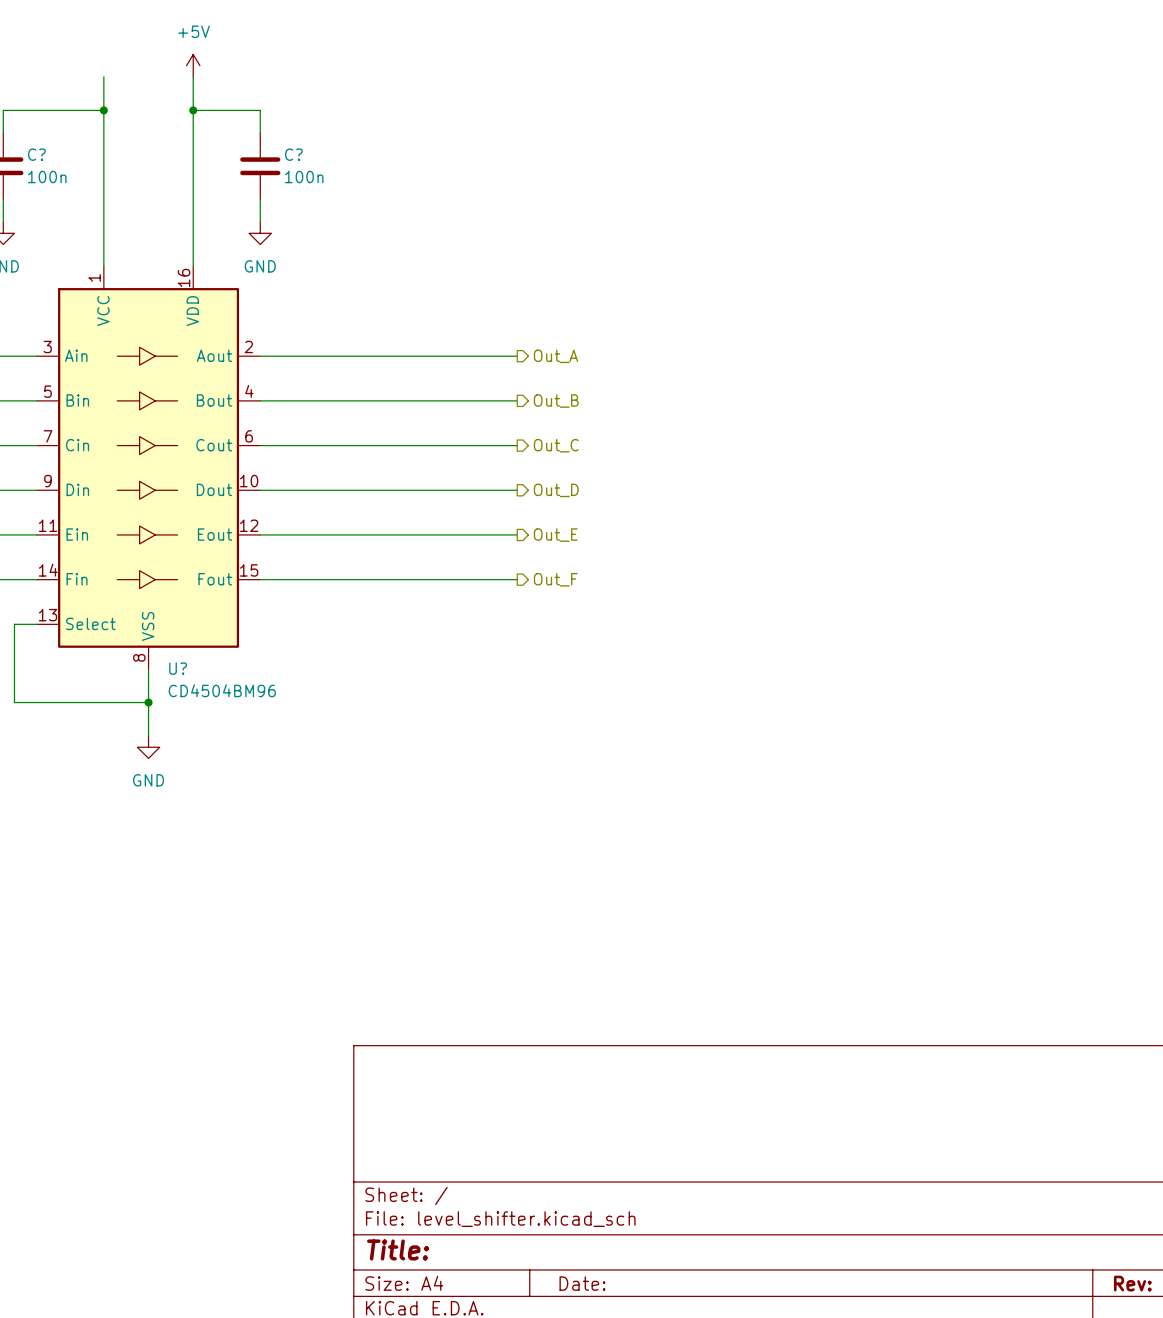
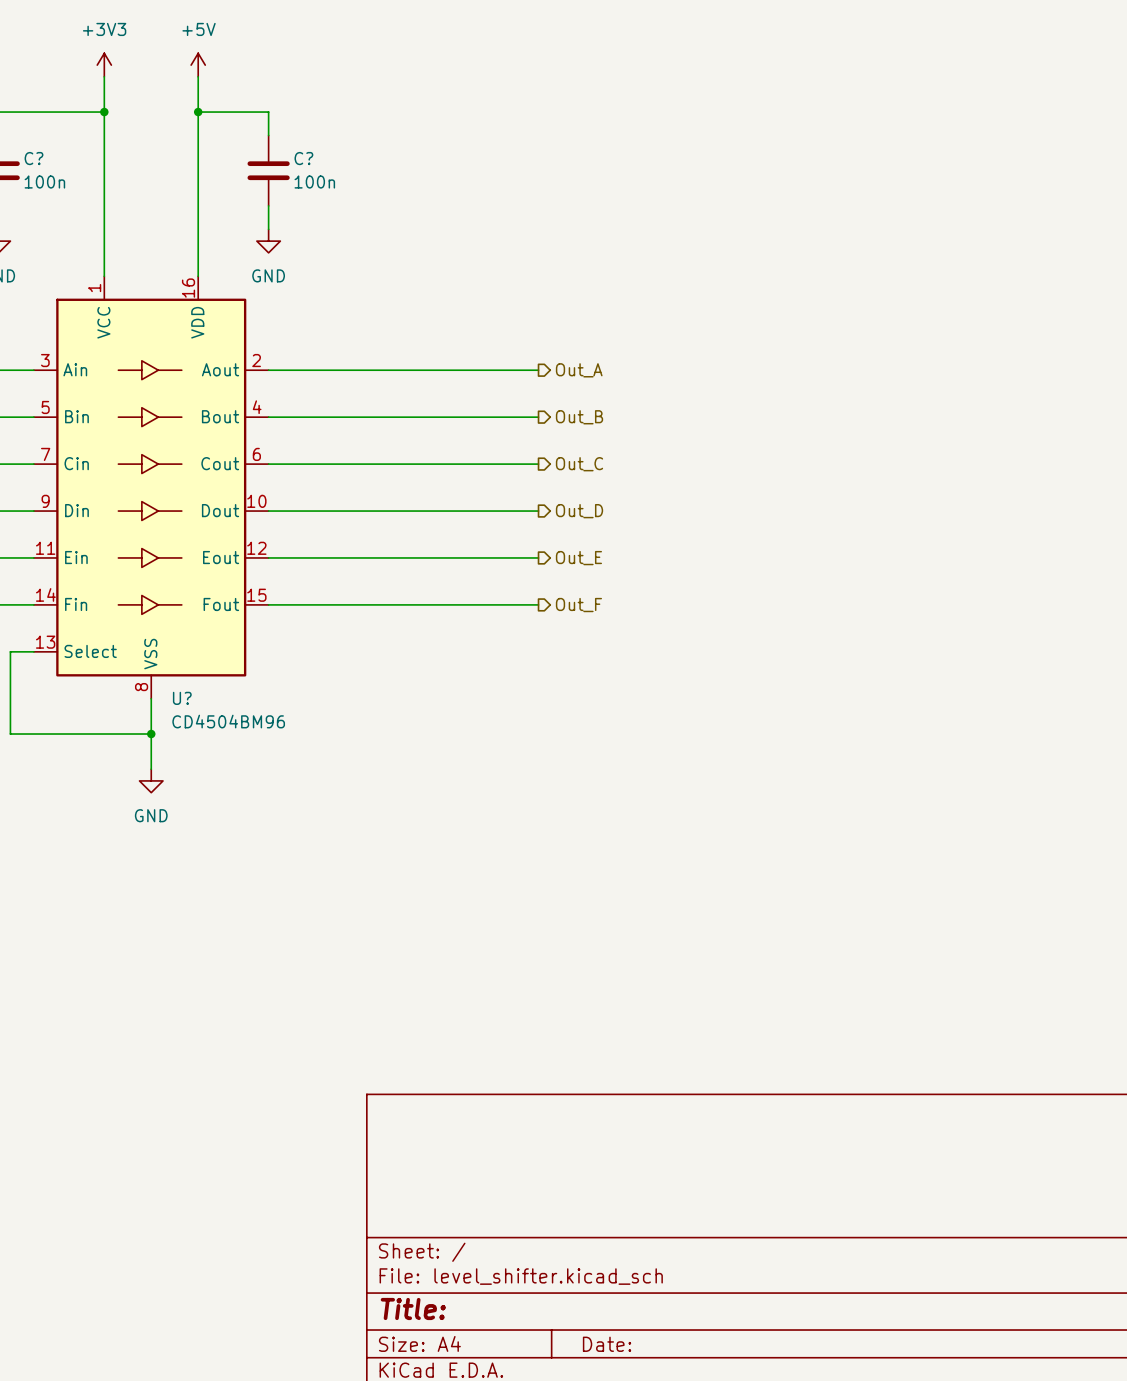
power symbol: none -> +3V3 (104, 65)

